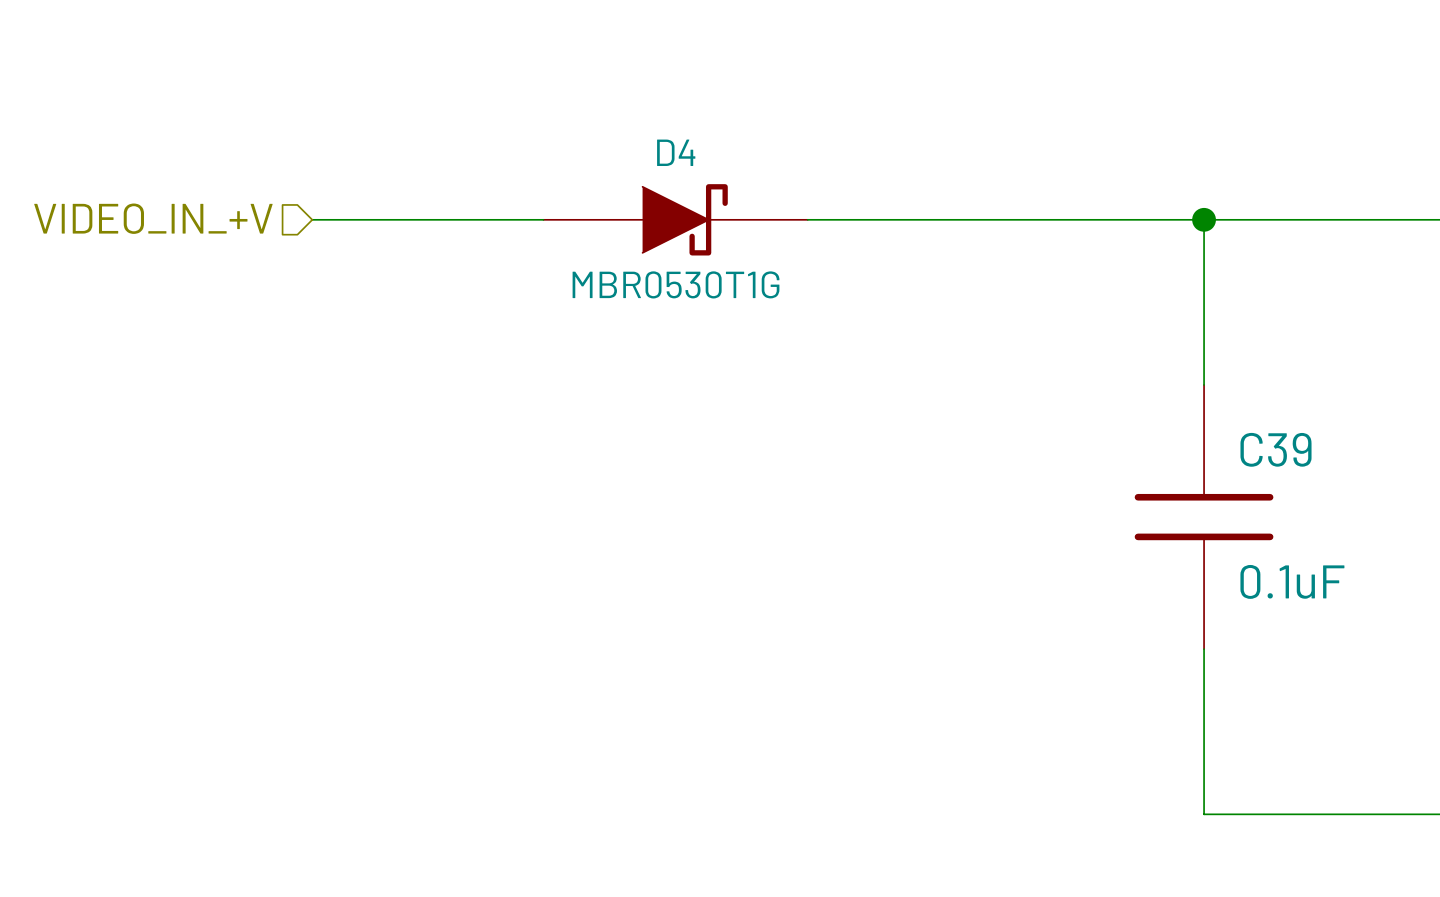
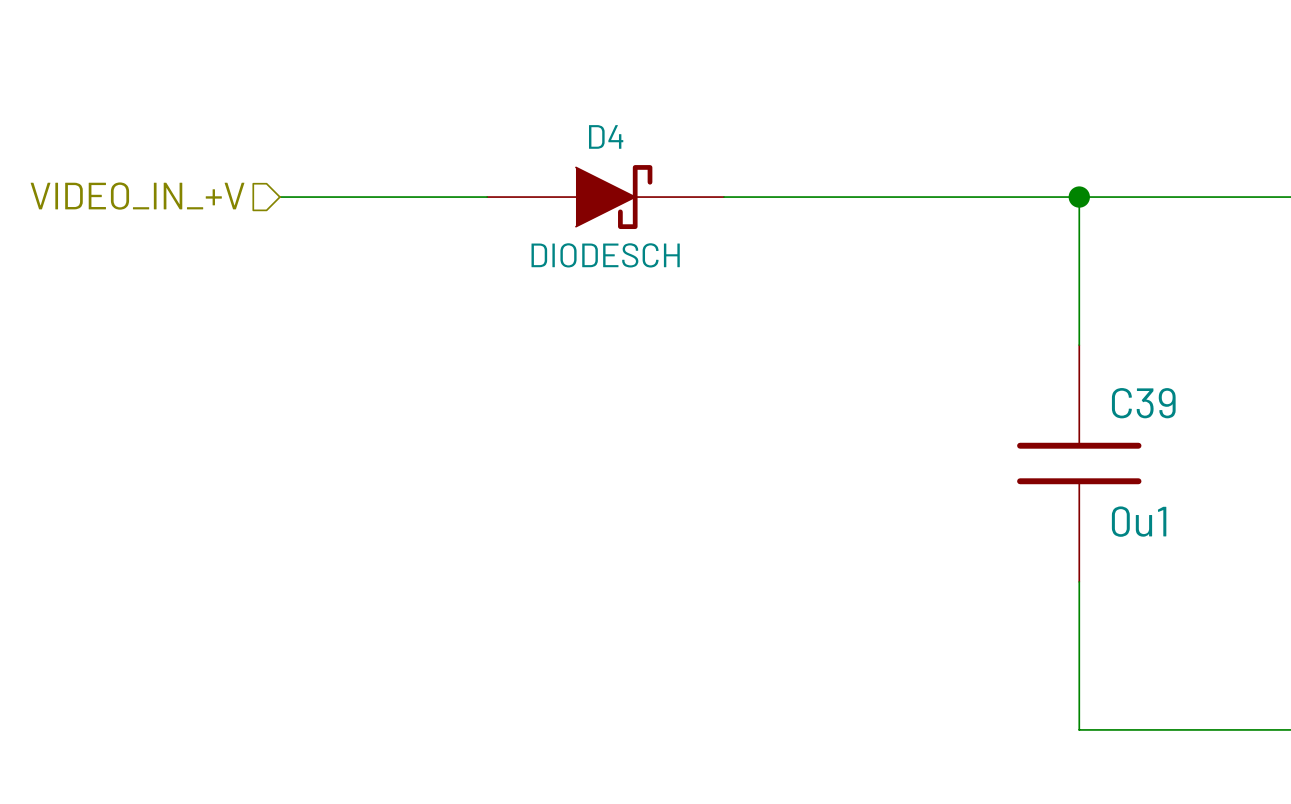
D4 value: MBR0530T1G (676, 284) -> DIODESCH (605, 255)
C39 value: 0.1uF (1292, 581) -> 0u1 (1139, 521)

